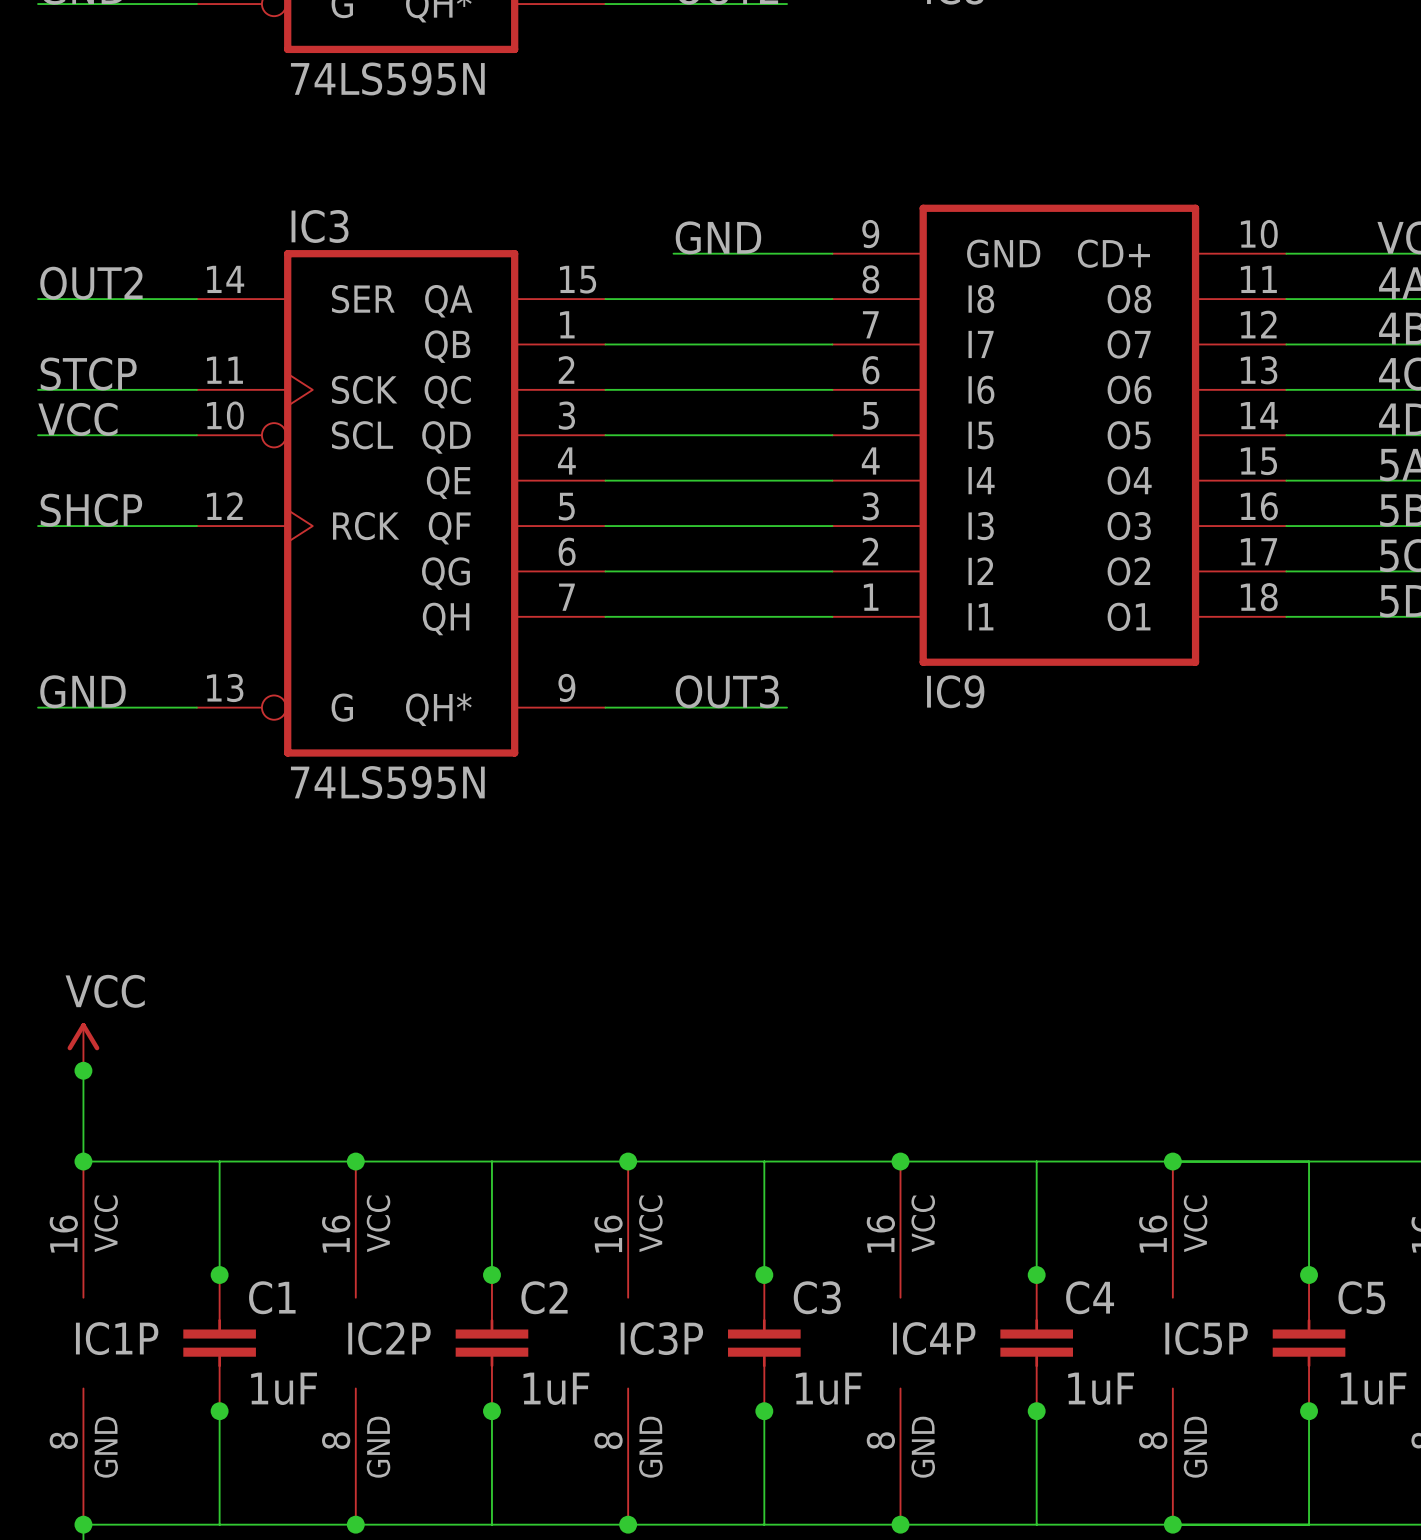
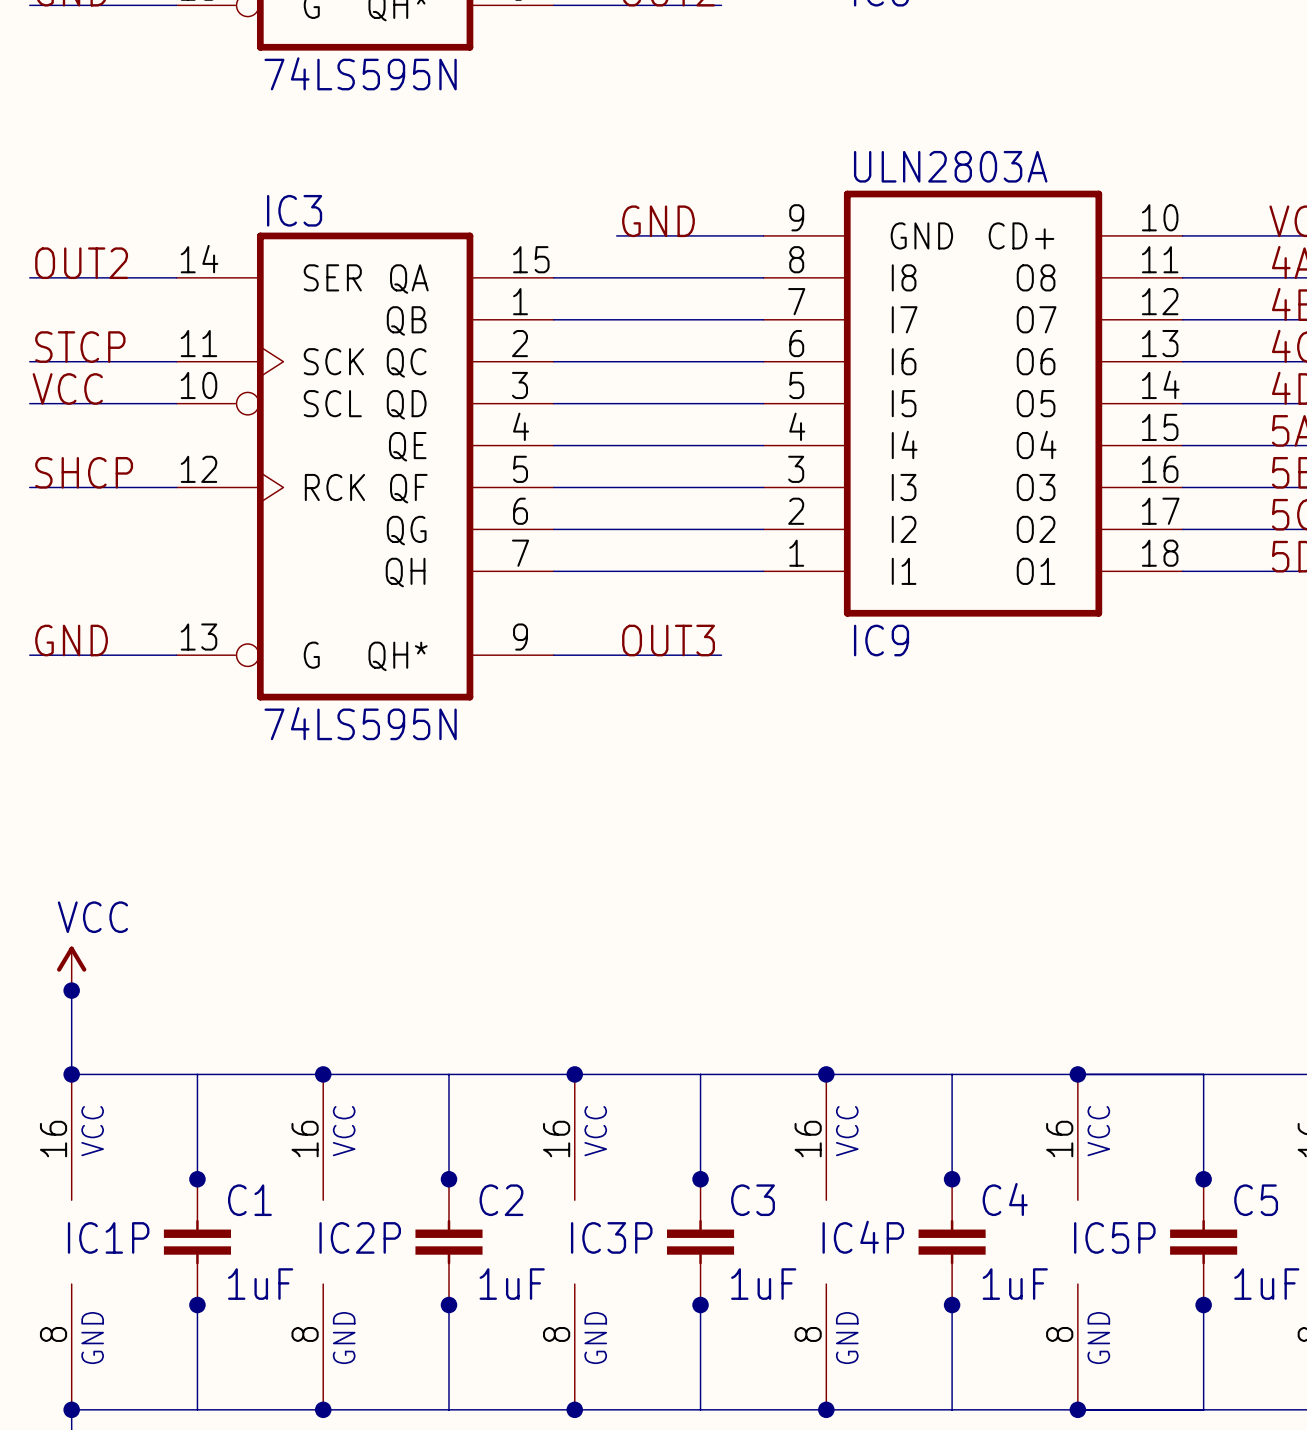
IC9 value: none -> ULN2803A (950, 166)

